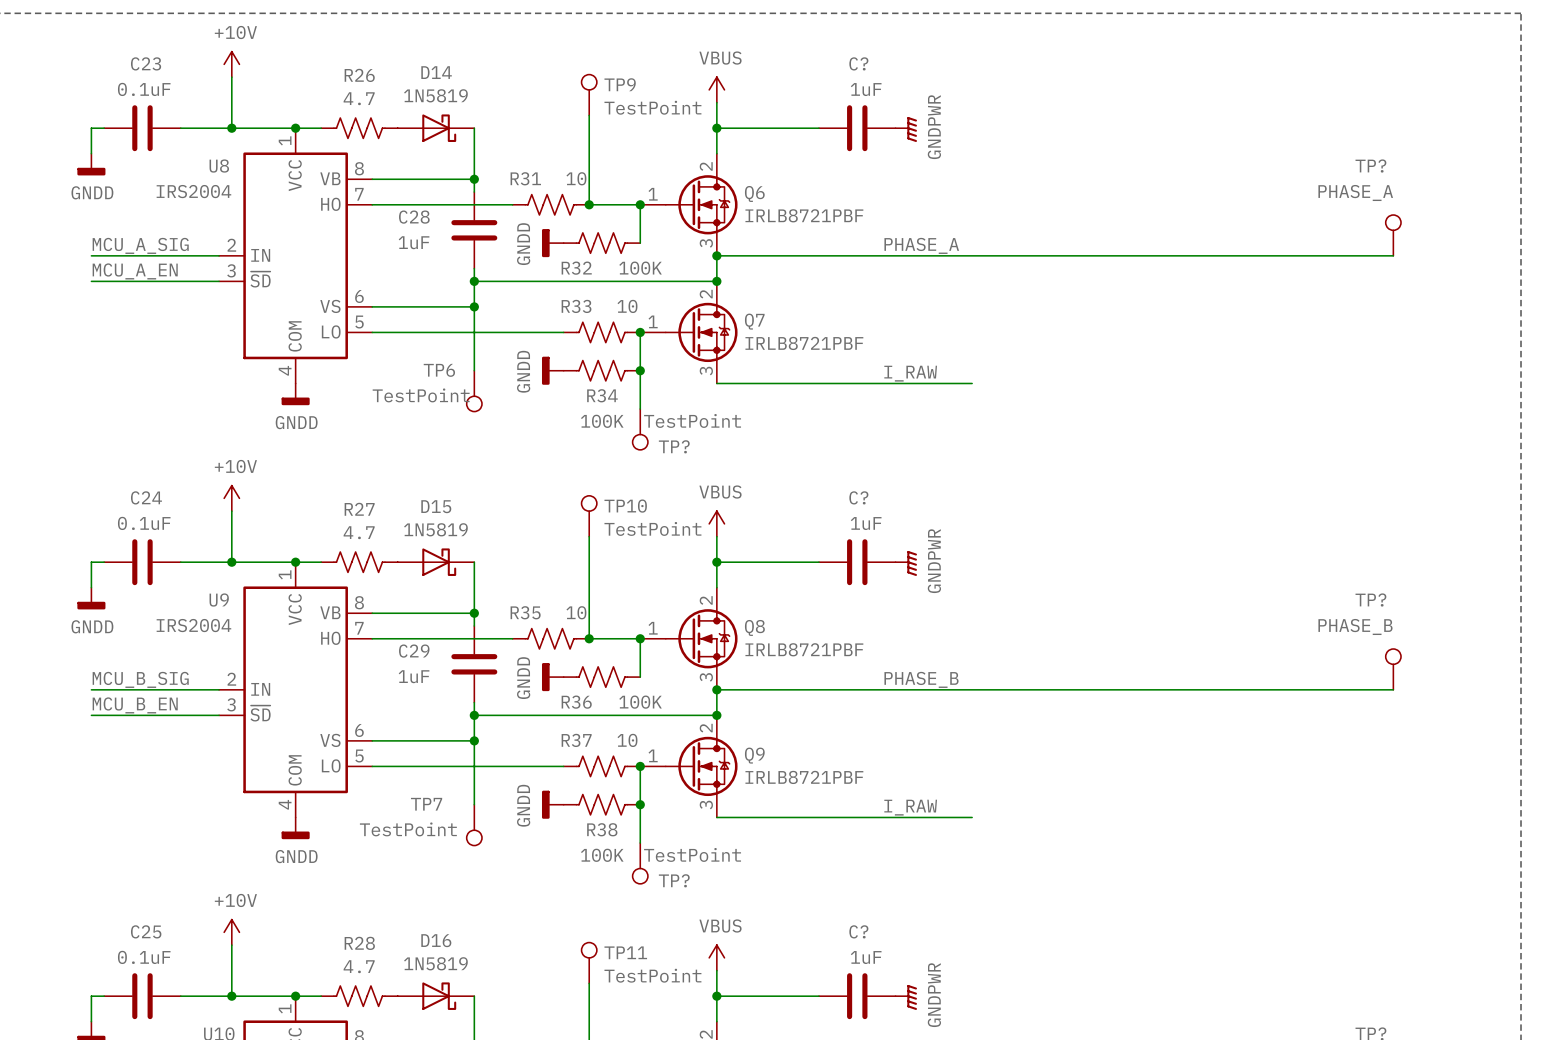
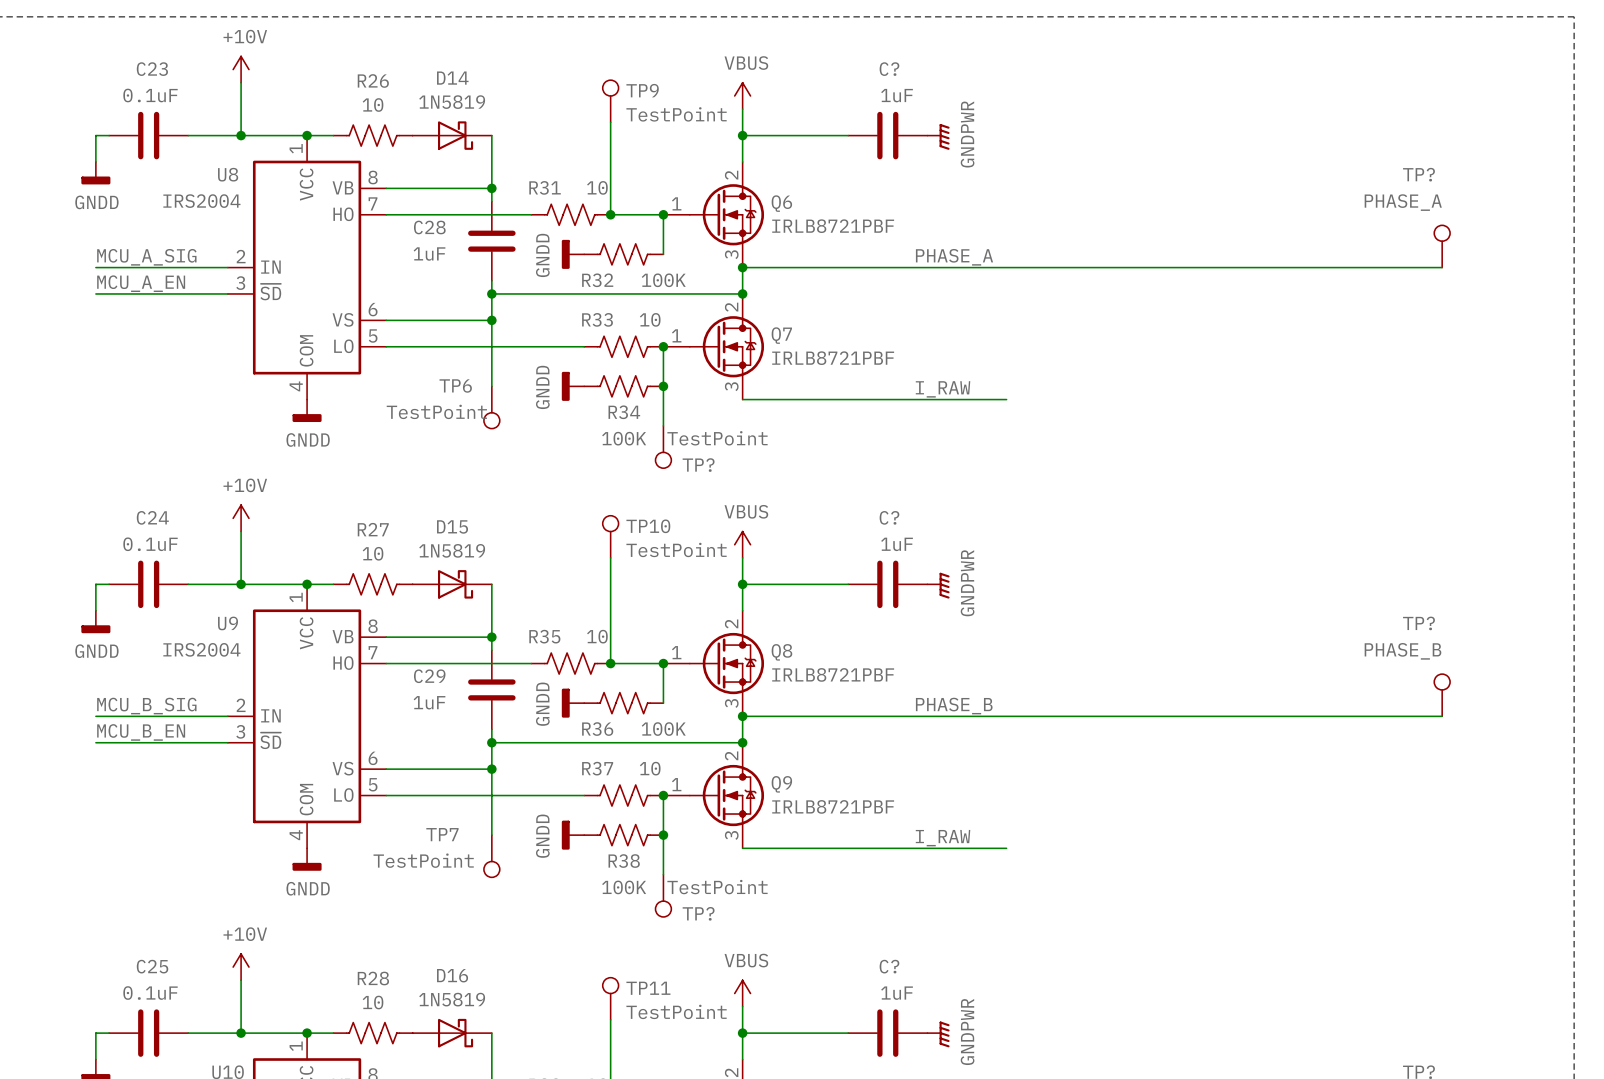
R26 value: 4.7 (359, 98) -> 10 (373, 105)
R27 value: 4.7 (359, 532) -> 10 (373, 553)
R28 value: 4.7 (359, 966) -> 10 (373, 1002)

